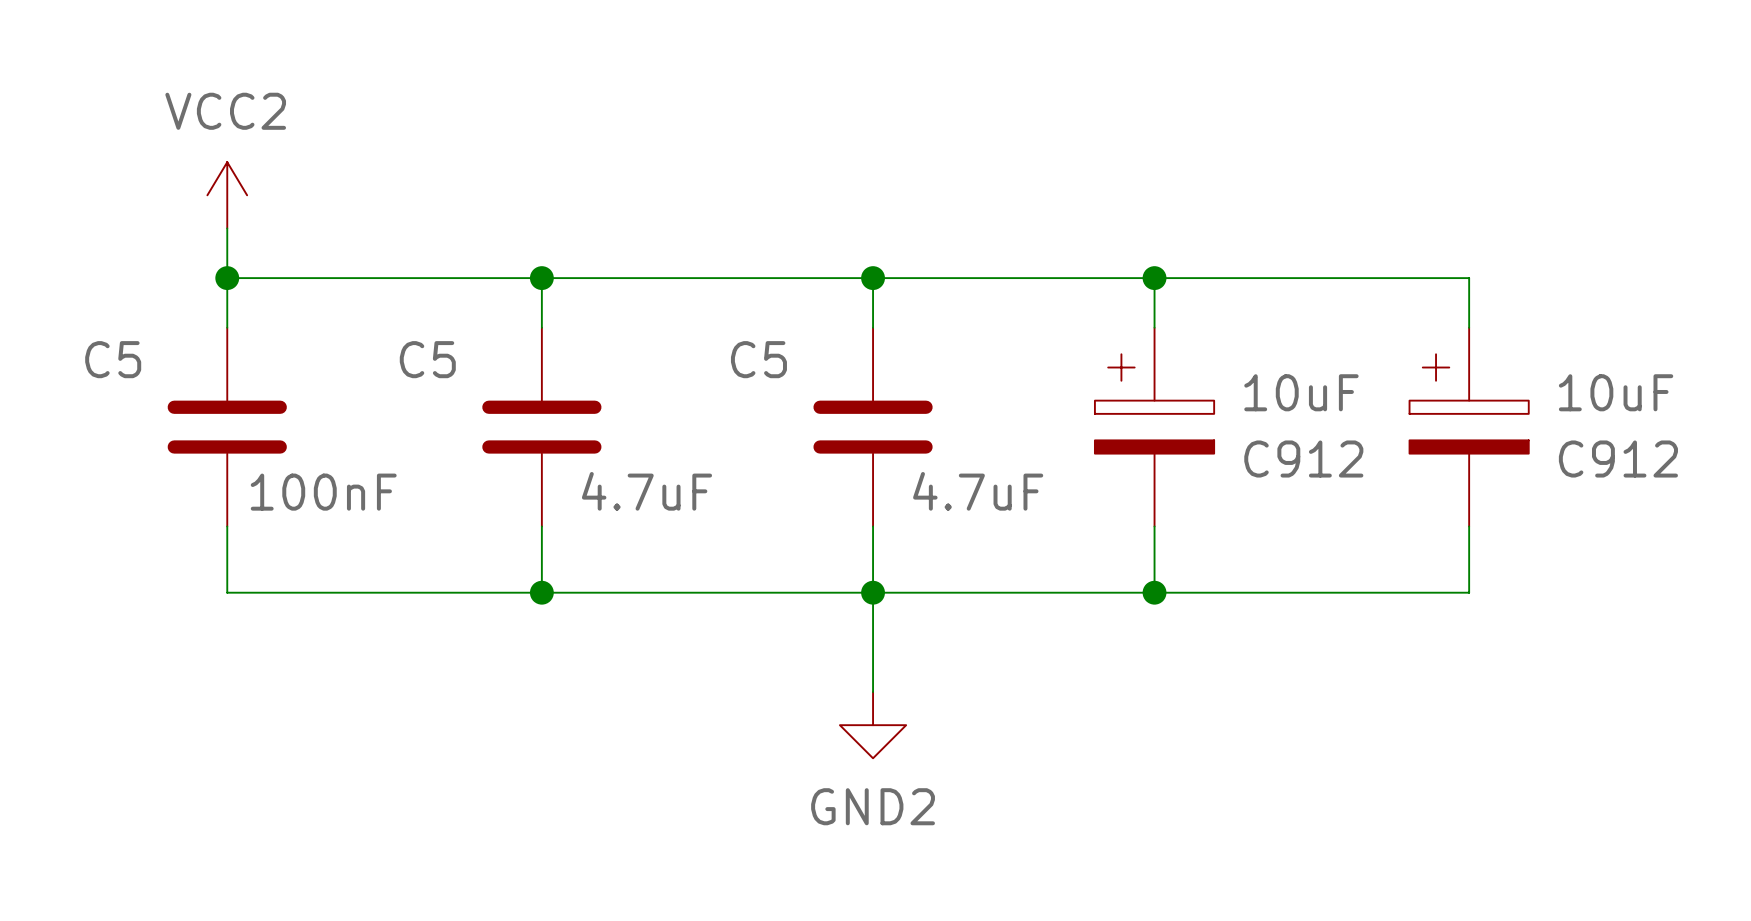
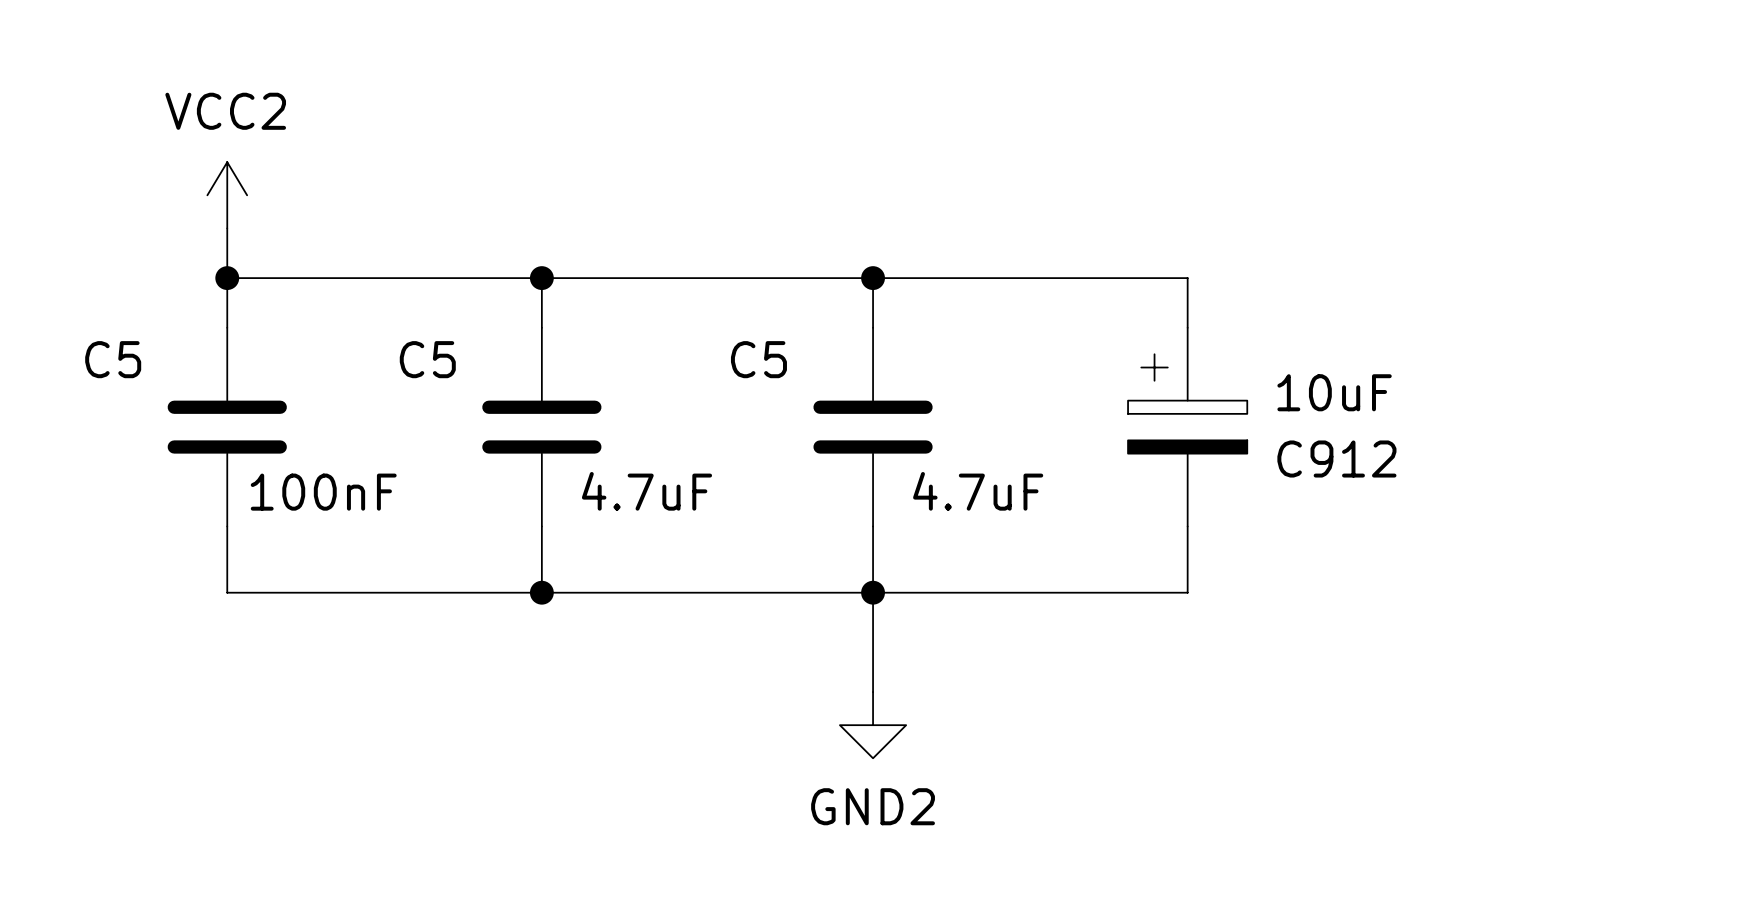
wire: (1154, 278) (1154, 327) -> none
junction: (1154, 278) -> none
wire: (1187, 278) (1469, 278) (1469, 327) -> (1187, 278) (1187, 327)
C912 position: (1154, 427) -> (1187, 427)
C912: 10uF (1469, 427) -> none
wire: (1154, 526) (1154, 592) -> none
wire: (1469, 526) (1469, 592) (1187, 592) -> (1187, 526) (1187, 592)
junction: (1154, 592) -> none

